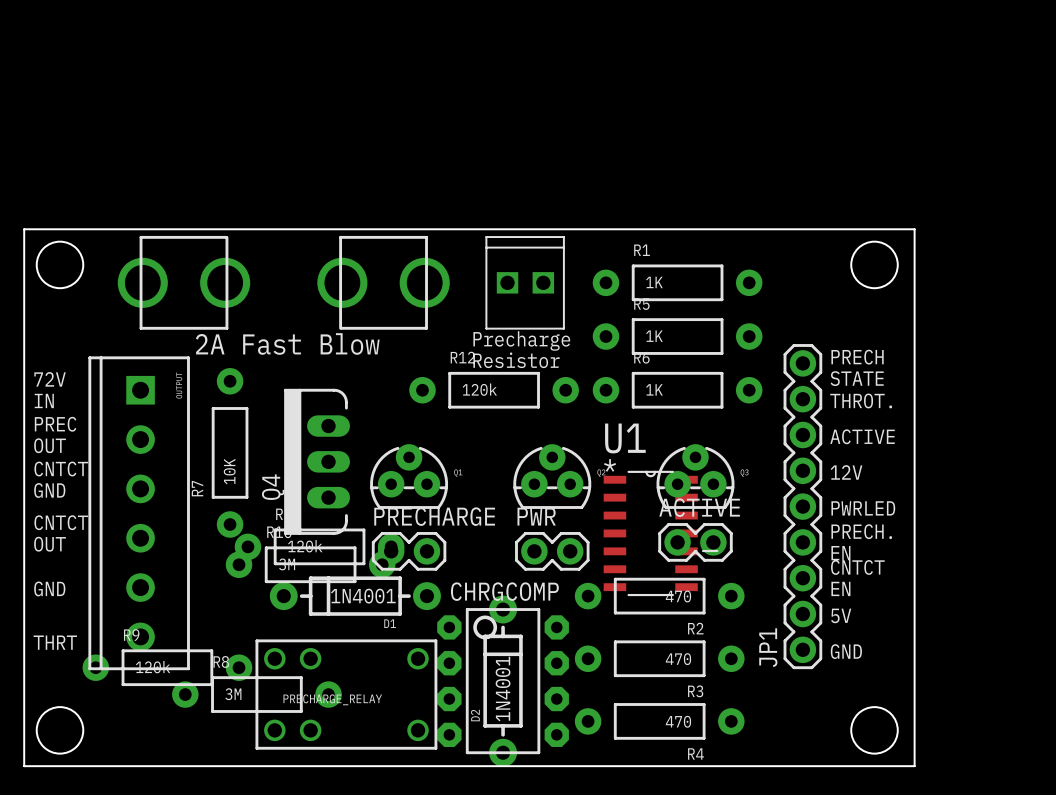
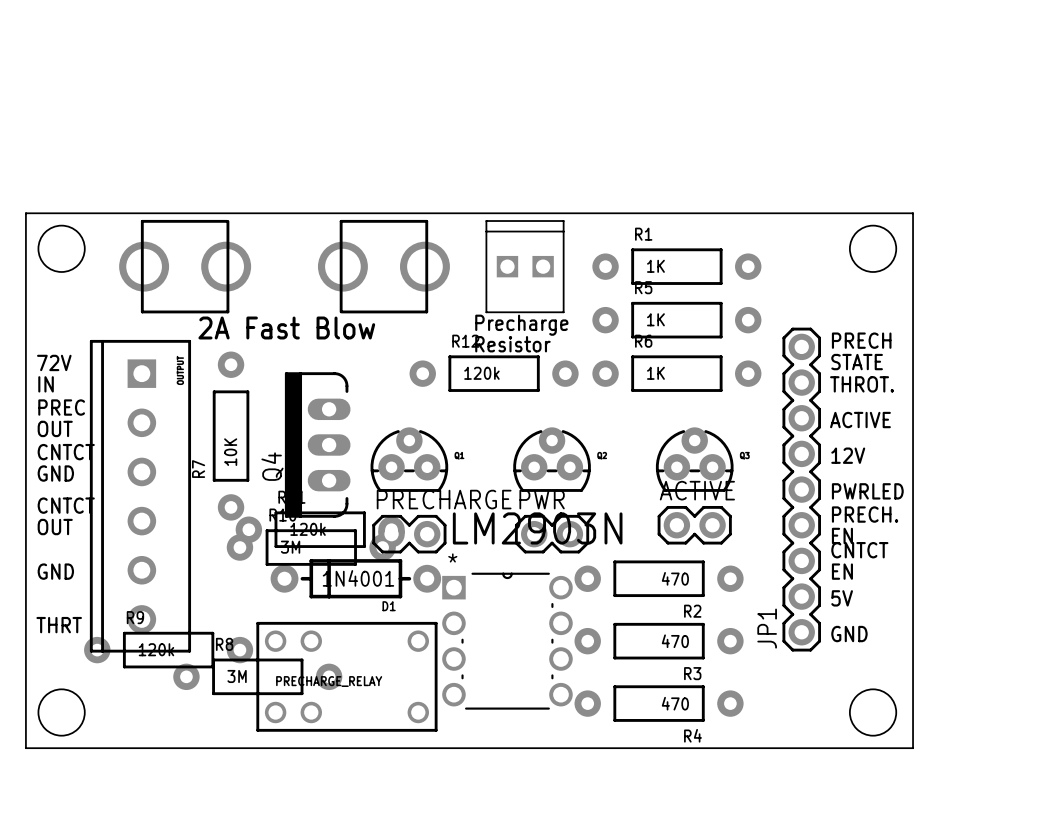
U1: (661, 533) -> none
LM2903N: none -> (507, 641)
CHRGCOMP: (503, 681) -> none
D2: 1N4001 (503, 681) -> none

